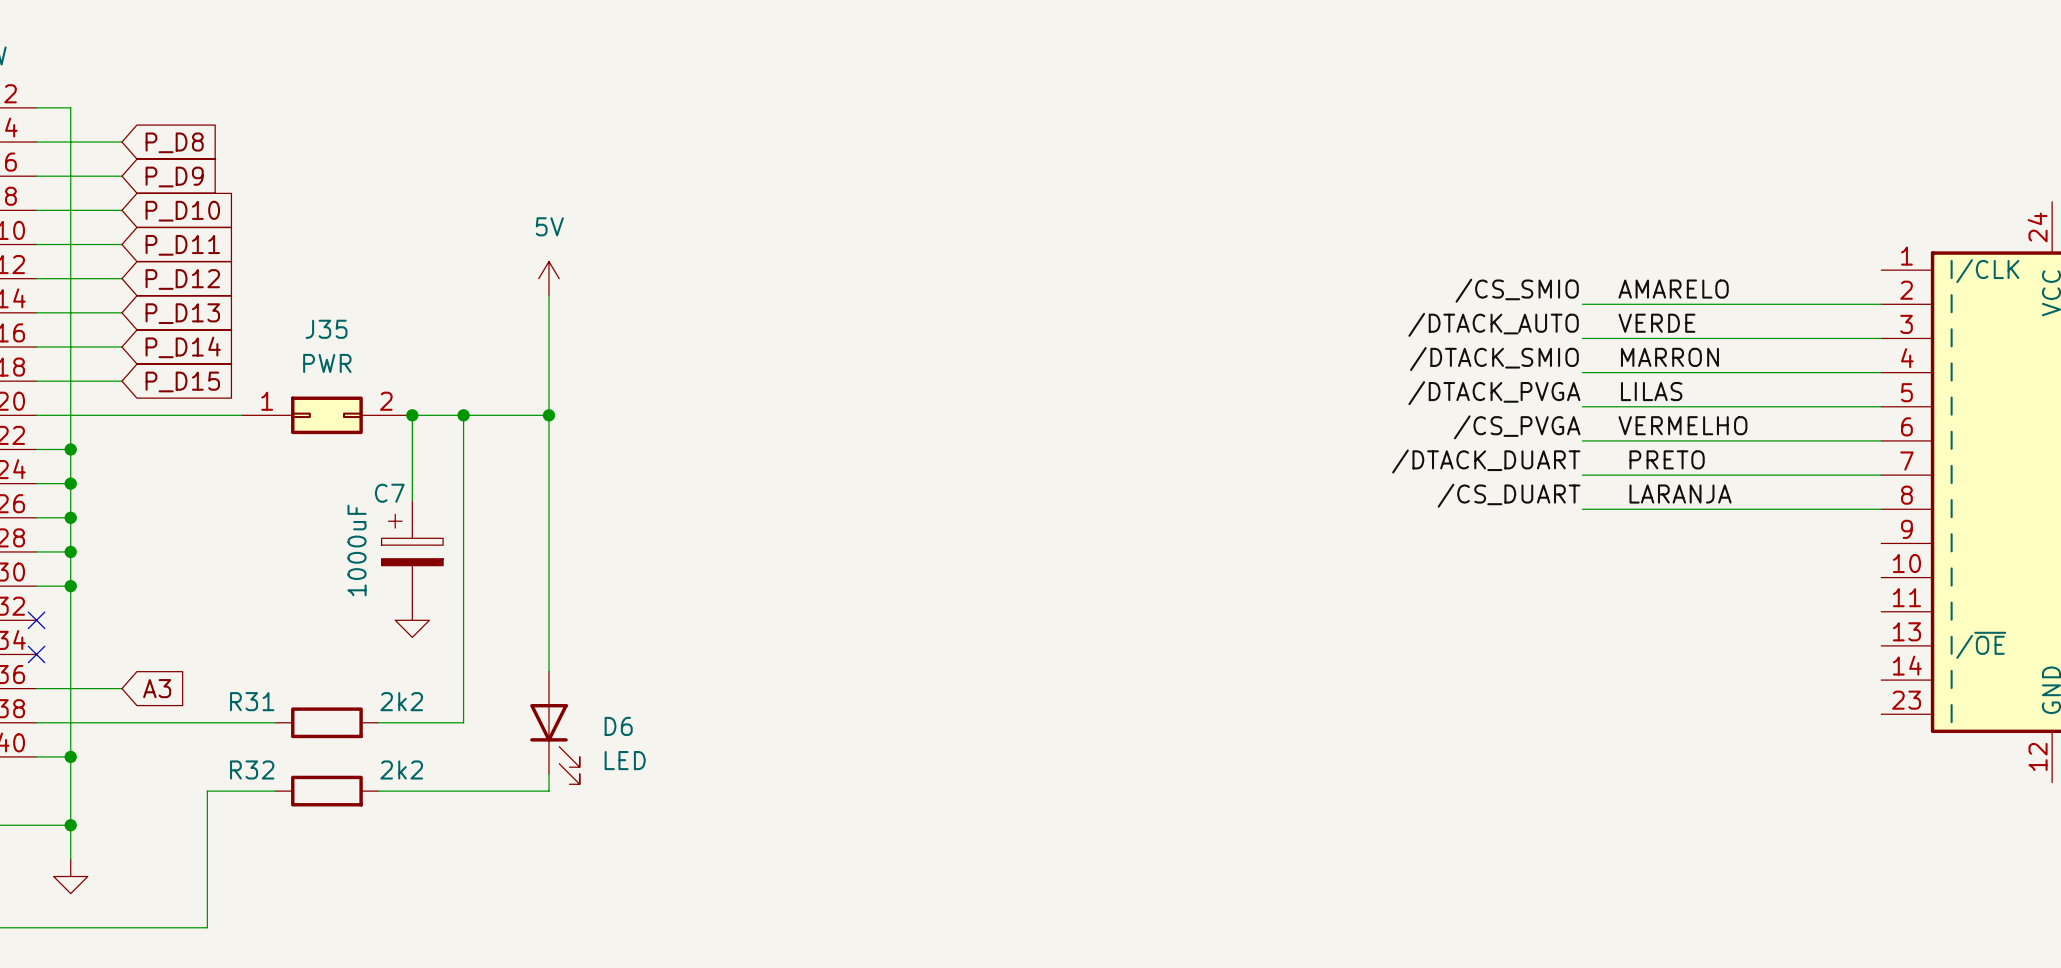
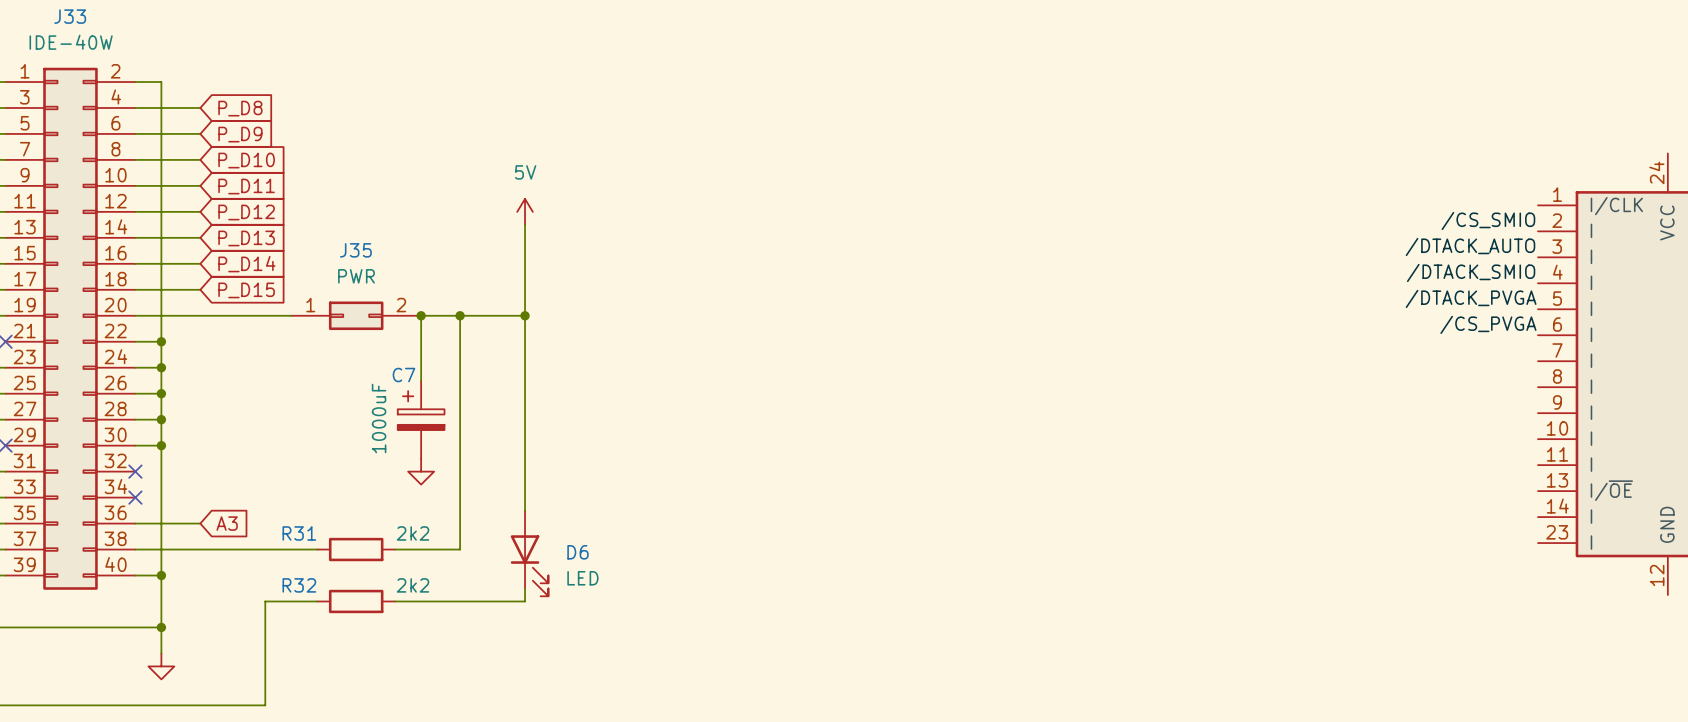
label: AMARELO (1673, 289) -> none
label position: /CS_SMIO (1517, 290) -> /CS_SMIO (1488, 221)
wire: (1582, 304) (1881, 304) -> none
label: VERDE (1656, 323) -> none
label position: /DTACK_AUTO (1493, 324) -> /DTACK_AUTO (1470, 246)
wire: (1582, 338) (1881, 338) -> none
label: MARRON (1669, 357) -> none
label position: /DTACK_SMIO (1494, 359) -> /DTACK_SMIO (1471, 272)
wire: (1582, 372) (1881, 372) -> none
label: LILAS (1651, 391) -> none
label position: /DTACK_PVGA (1494, 393) -> /DTACK_PVGA (1471, 298)
wire: (1582, 406) (1881, 406) -> none
label: VERMELHO (1682, 425) -> none
label position: /CS_PVGA (1517, 427) -> /CS_PVGA (1488, 324)
wire: (1582, 440) (1881, 440) -> none
label: PRETO (1667, 459) -> none
label: /DTACK_DUART (1486, 461) -> none
wire: (1582, 475) (1881, 475) -> none
label: LARANJA (1680, 494) -> none
label: /CS_DUART (1509, 495) -> none
wire: (1582, 509) (1881, 509) -> none

